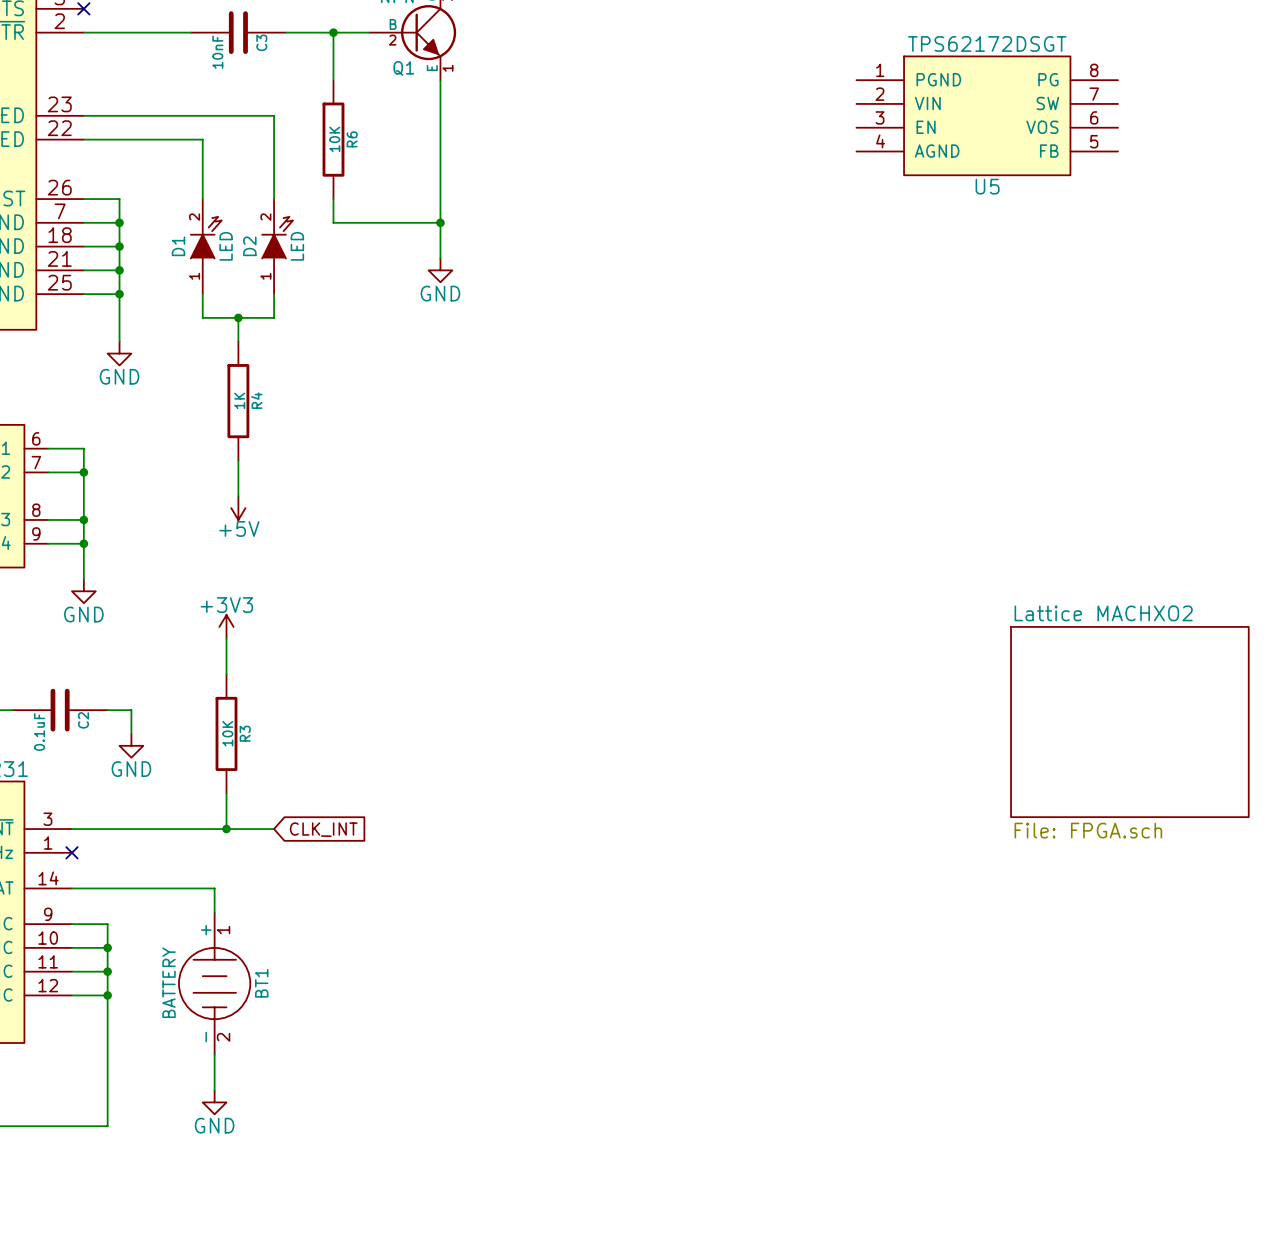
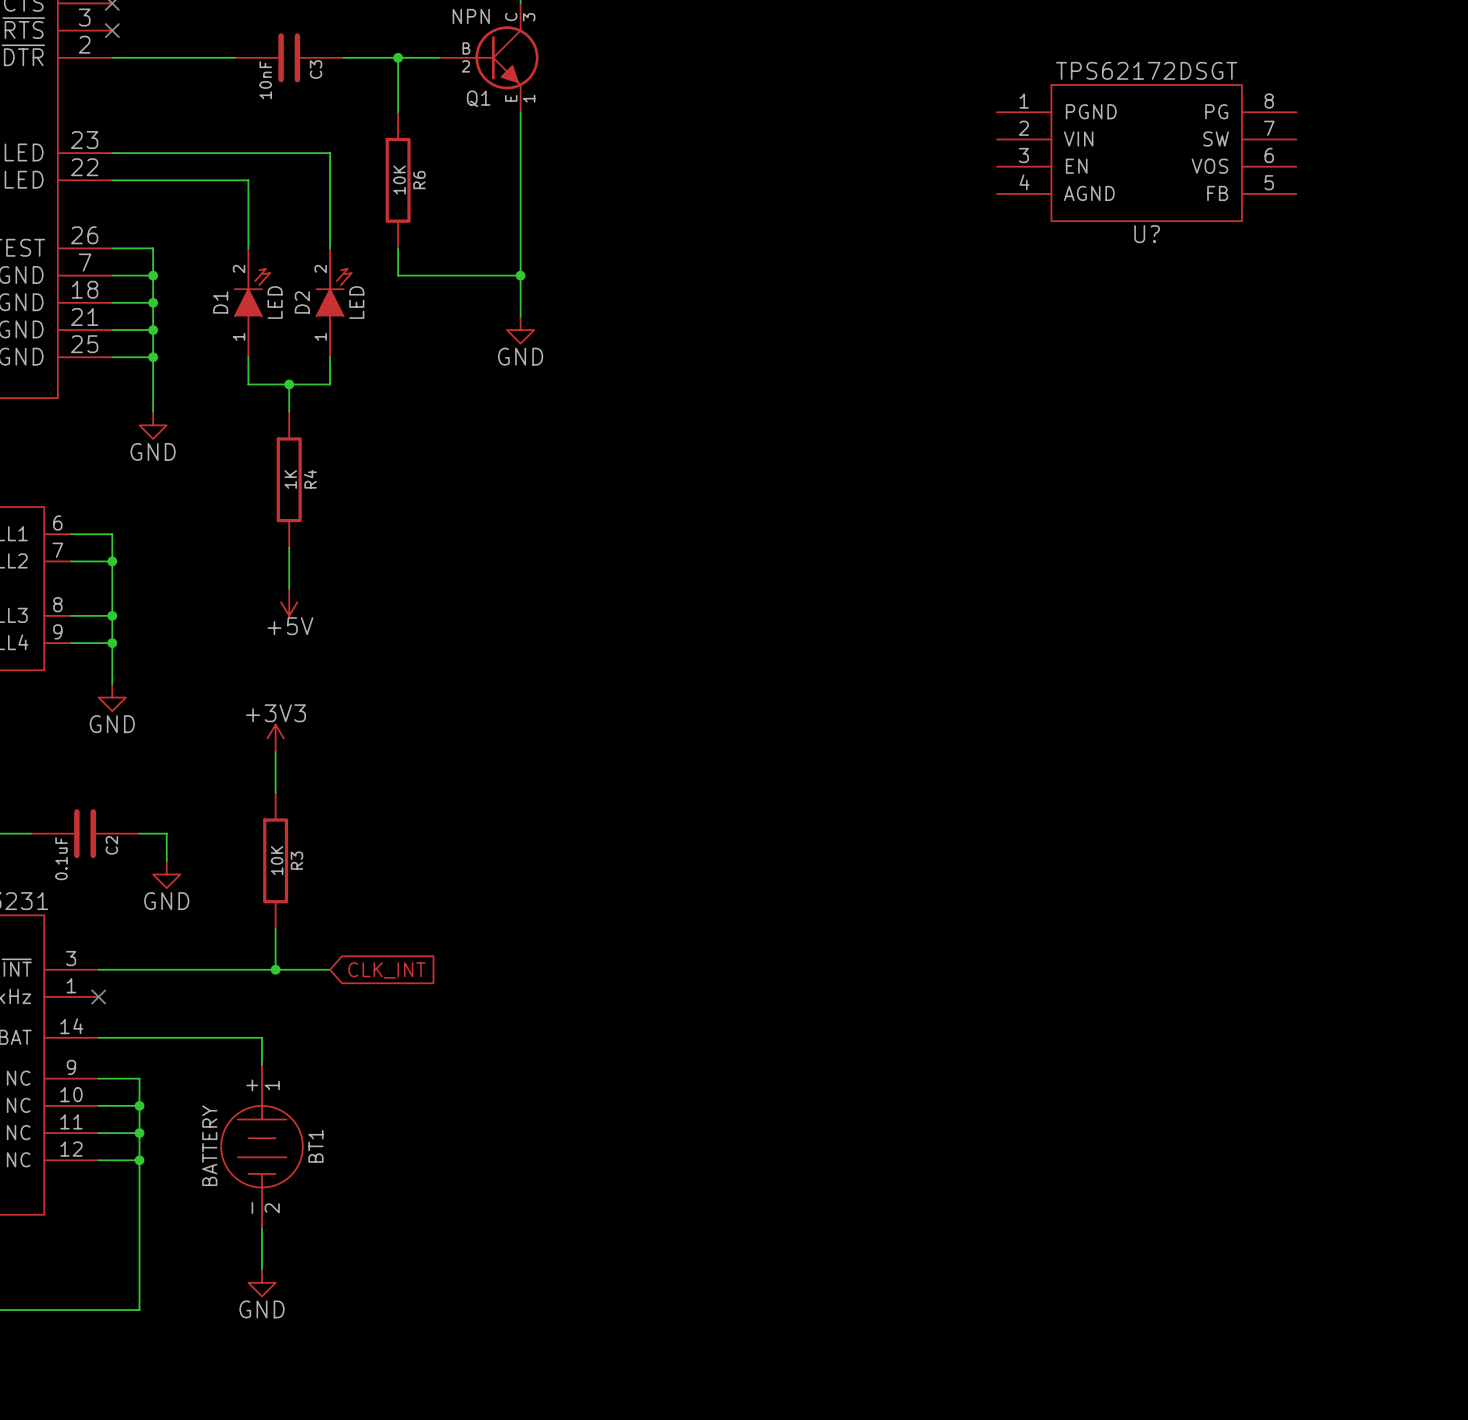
U5 name: U5 (987, 186) -> U? (1147, 234)
sheet Lattice MACHXO2: File: FPGA.sch (1129, 722) -> none

